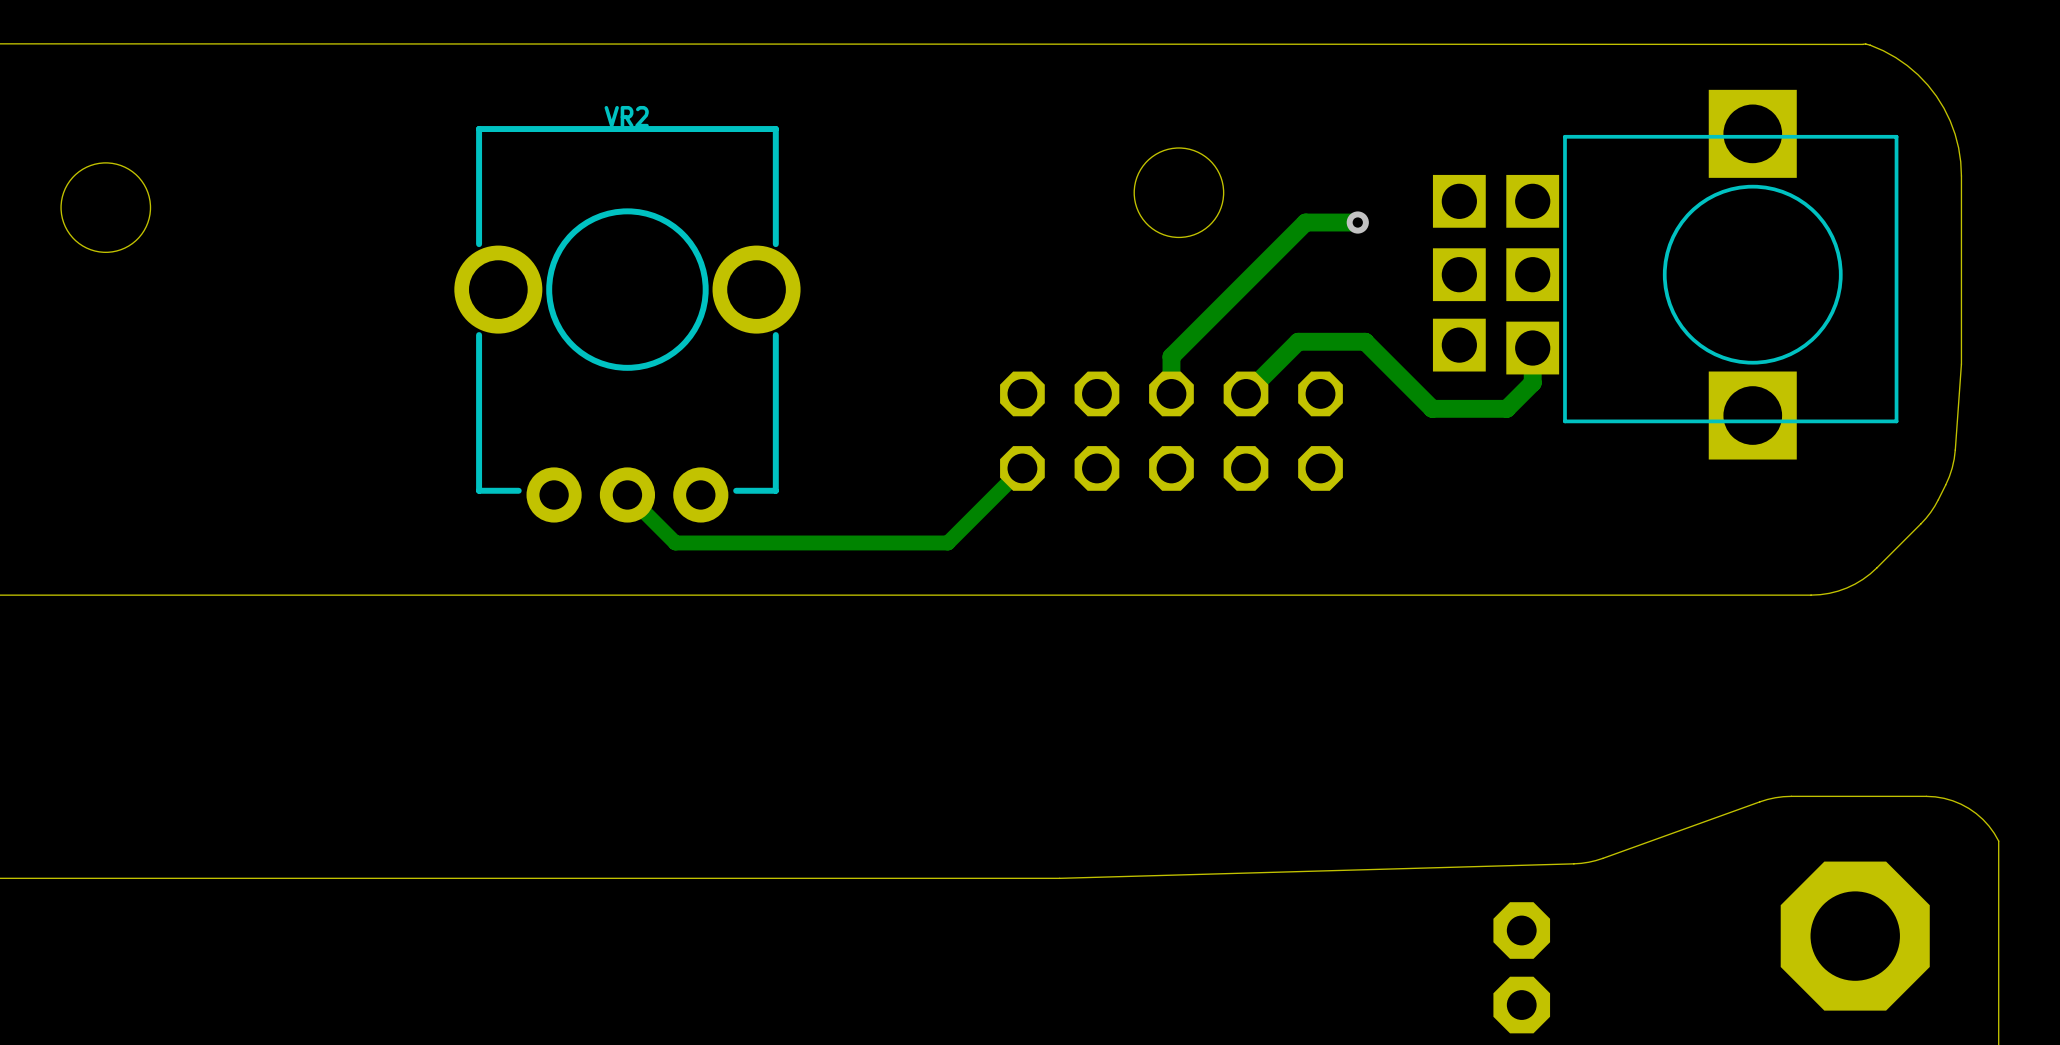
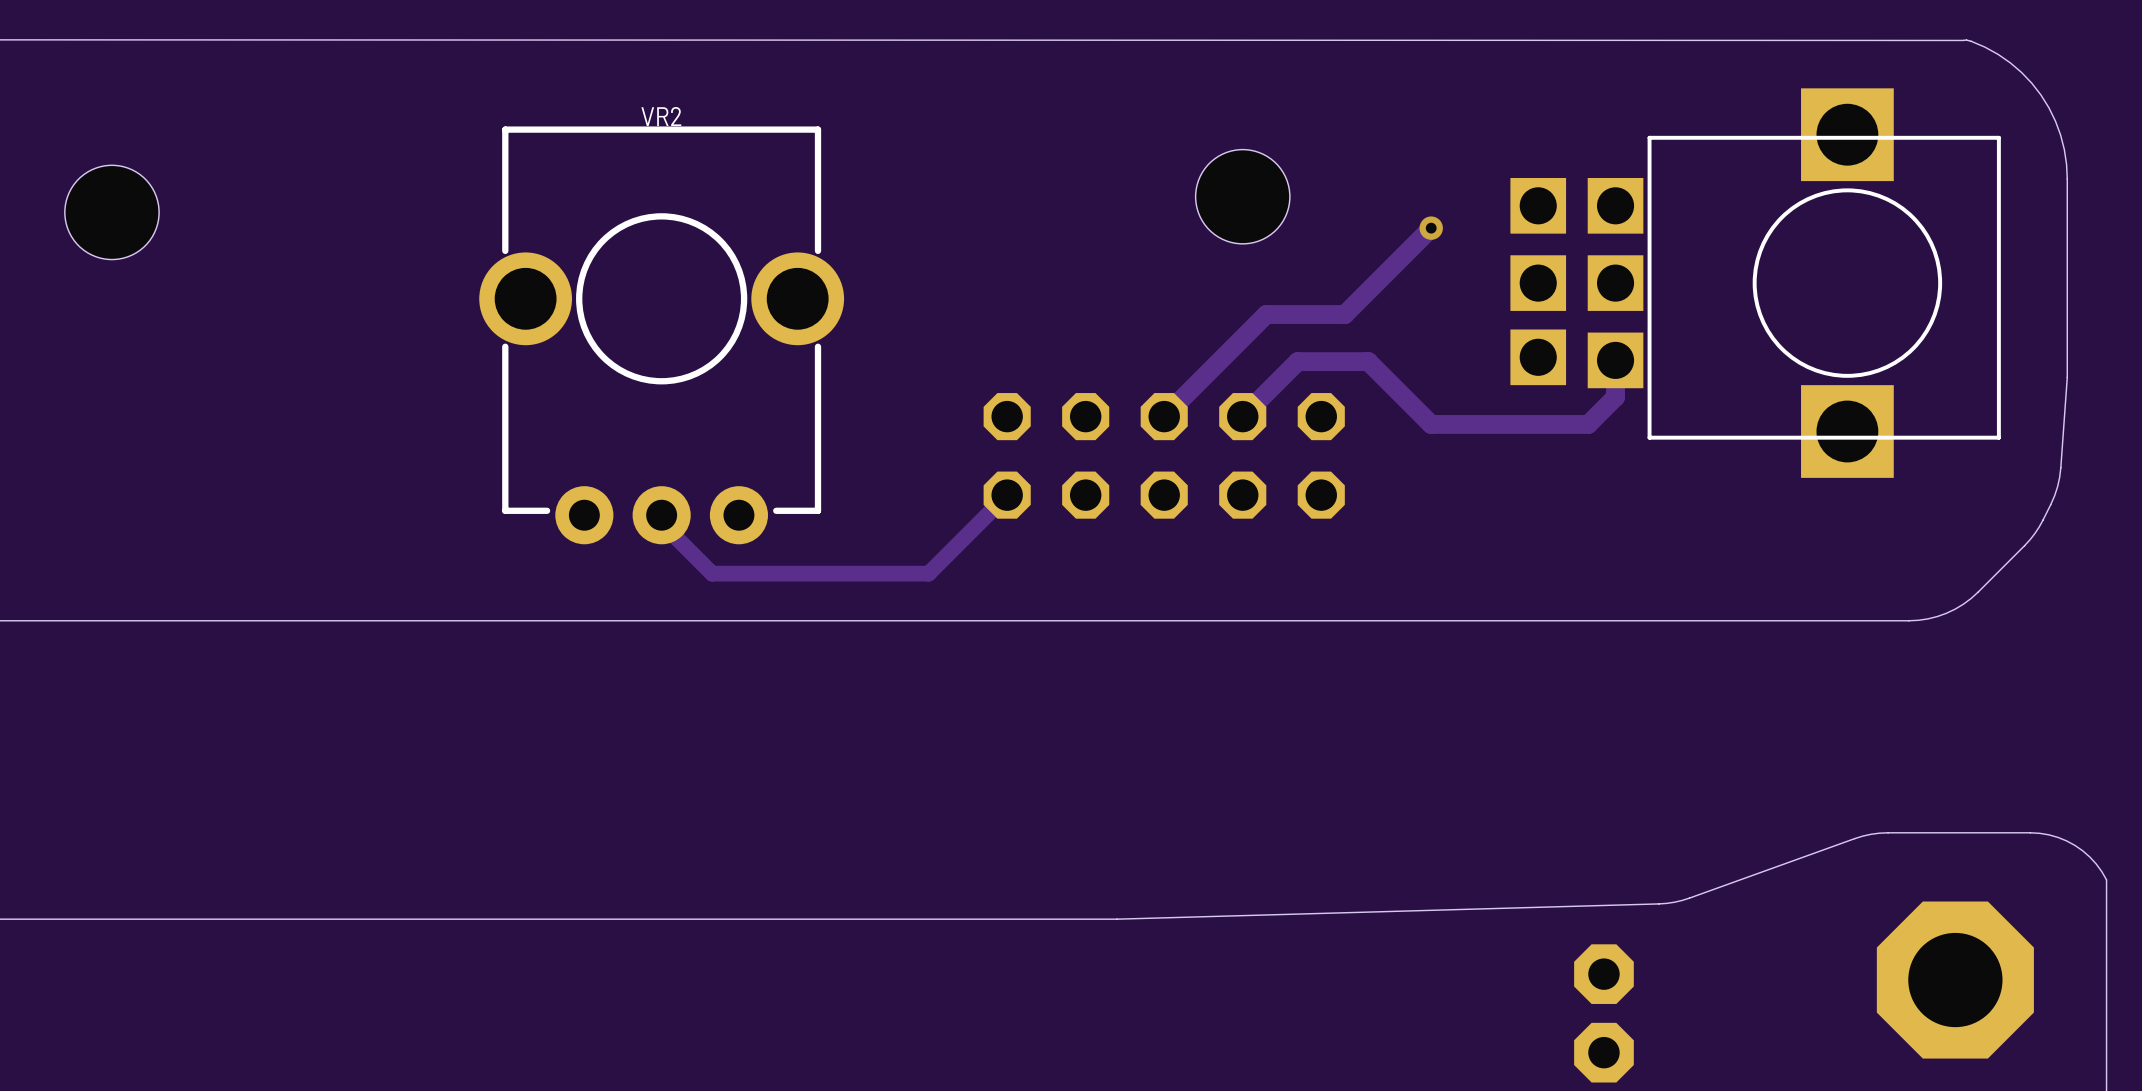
track: (1357, 222) (1305, 222) (1171, 356) (1171, 393) -> (1431, 228) (1344, 314) (1266, 314) (1164, 416)
track: (1246, 393) (1298, 341) (1365, 341) (1432, 408) -> (1242, 416) (1297, 361) (1368, 361) (1431, 424) (1509, 424)
part position: (1171, 431) -> (1164, 455)
track: (1022, 468) (947, 542) (675, 542) (627, 494) -> (1007, 495) (928, 573) (712, 573) (661, 523) (661, 515)

